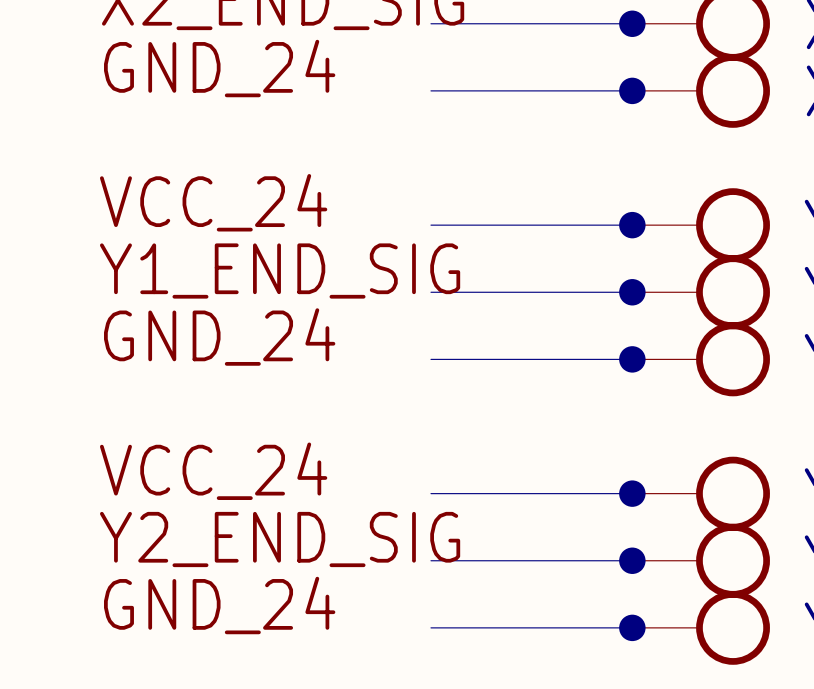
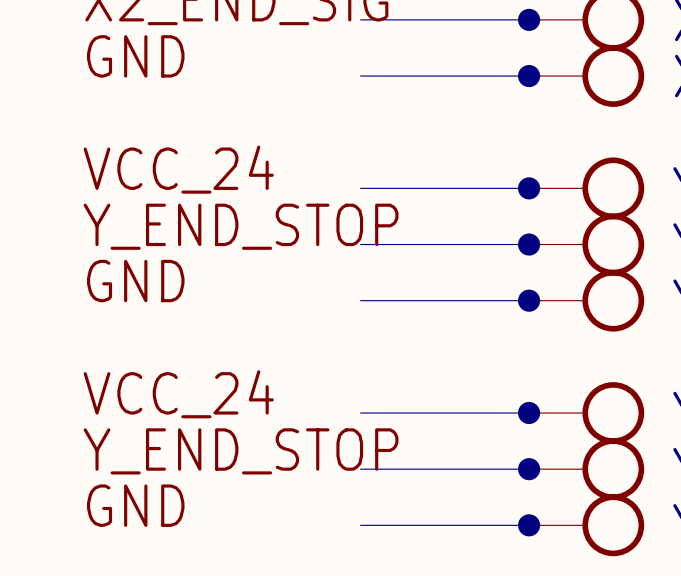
label: GND_24 (219, 68) -> GND (135, 56)
label: Y1_END_SIG (280, 271) -> Y_END_STOP (241, 226)
label: GND_24 (219, 337) -> GND (135, 281)
label: Y2_END_SIG (280, 539) -> Y_END_STOP (241, 451)
label: GND_24 (219, 605) -> GND (135, 505)

